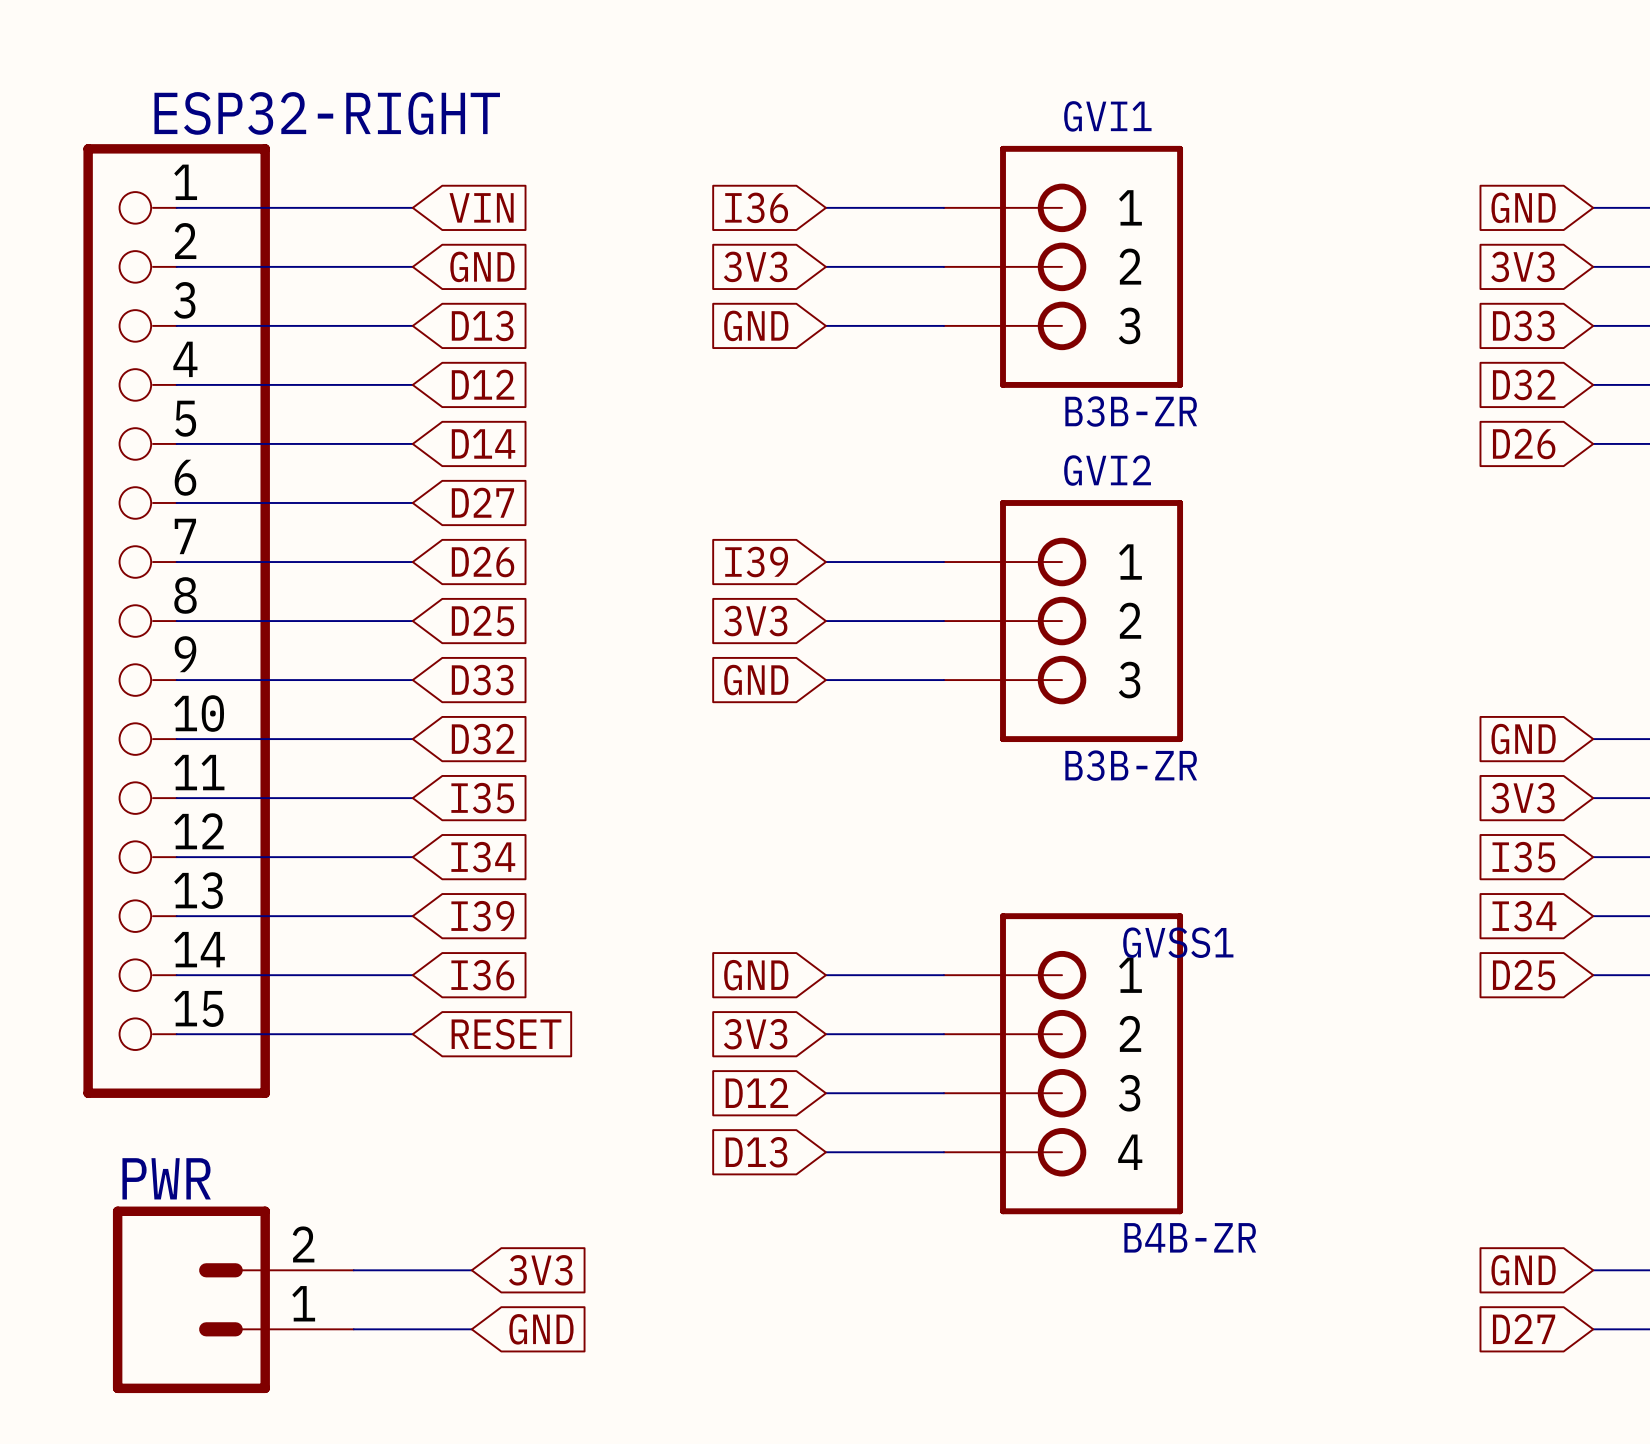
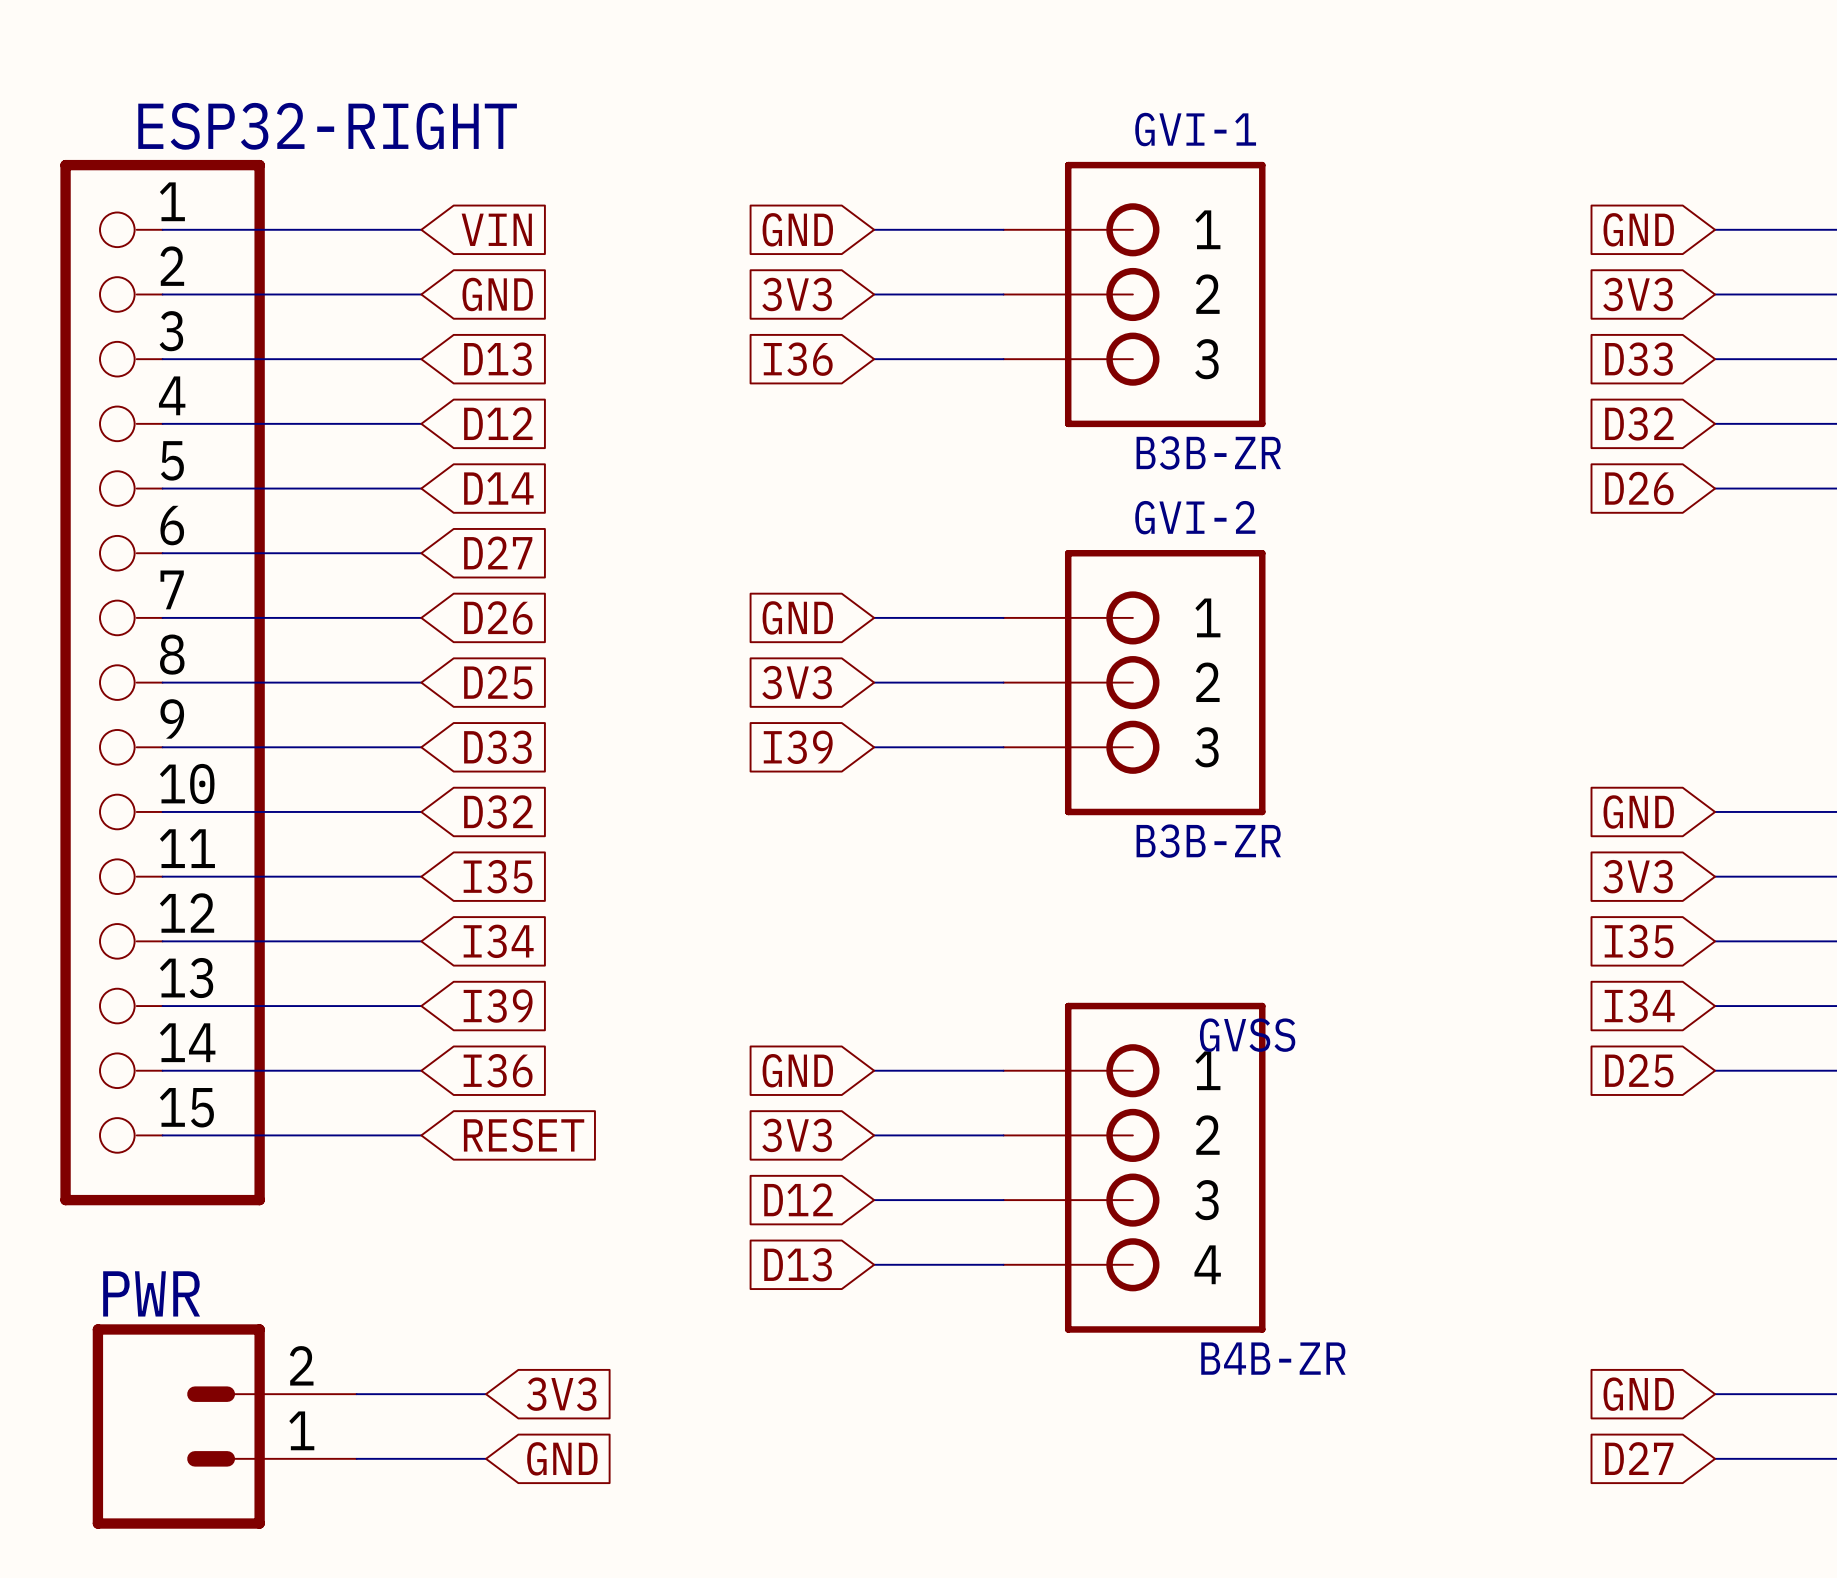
GVI1 name: GVI1 (1107, 116) -> GVI-1 (1195, 129)
global label: I36 (756, 207) -> GND (797, 229)
global label: GND (756, 325) -> I36 (798, 359)
GVI2 name: GVI2 (1107, 470) -> GVI-2 (1195, 517)
global label: I39 (756, 562) -> GND (797, 617)
global label: GND (756, 680) -> I39 (798, 747)
GVSS1 name: GVSS1 (1178, 942) -> GVSS (1247, 1035)

